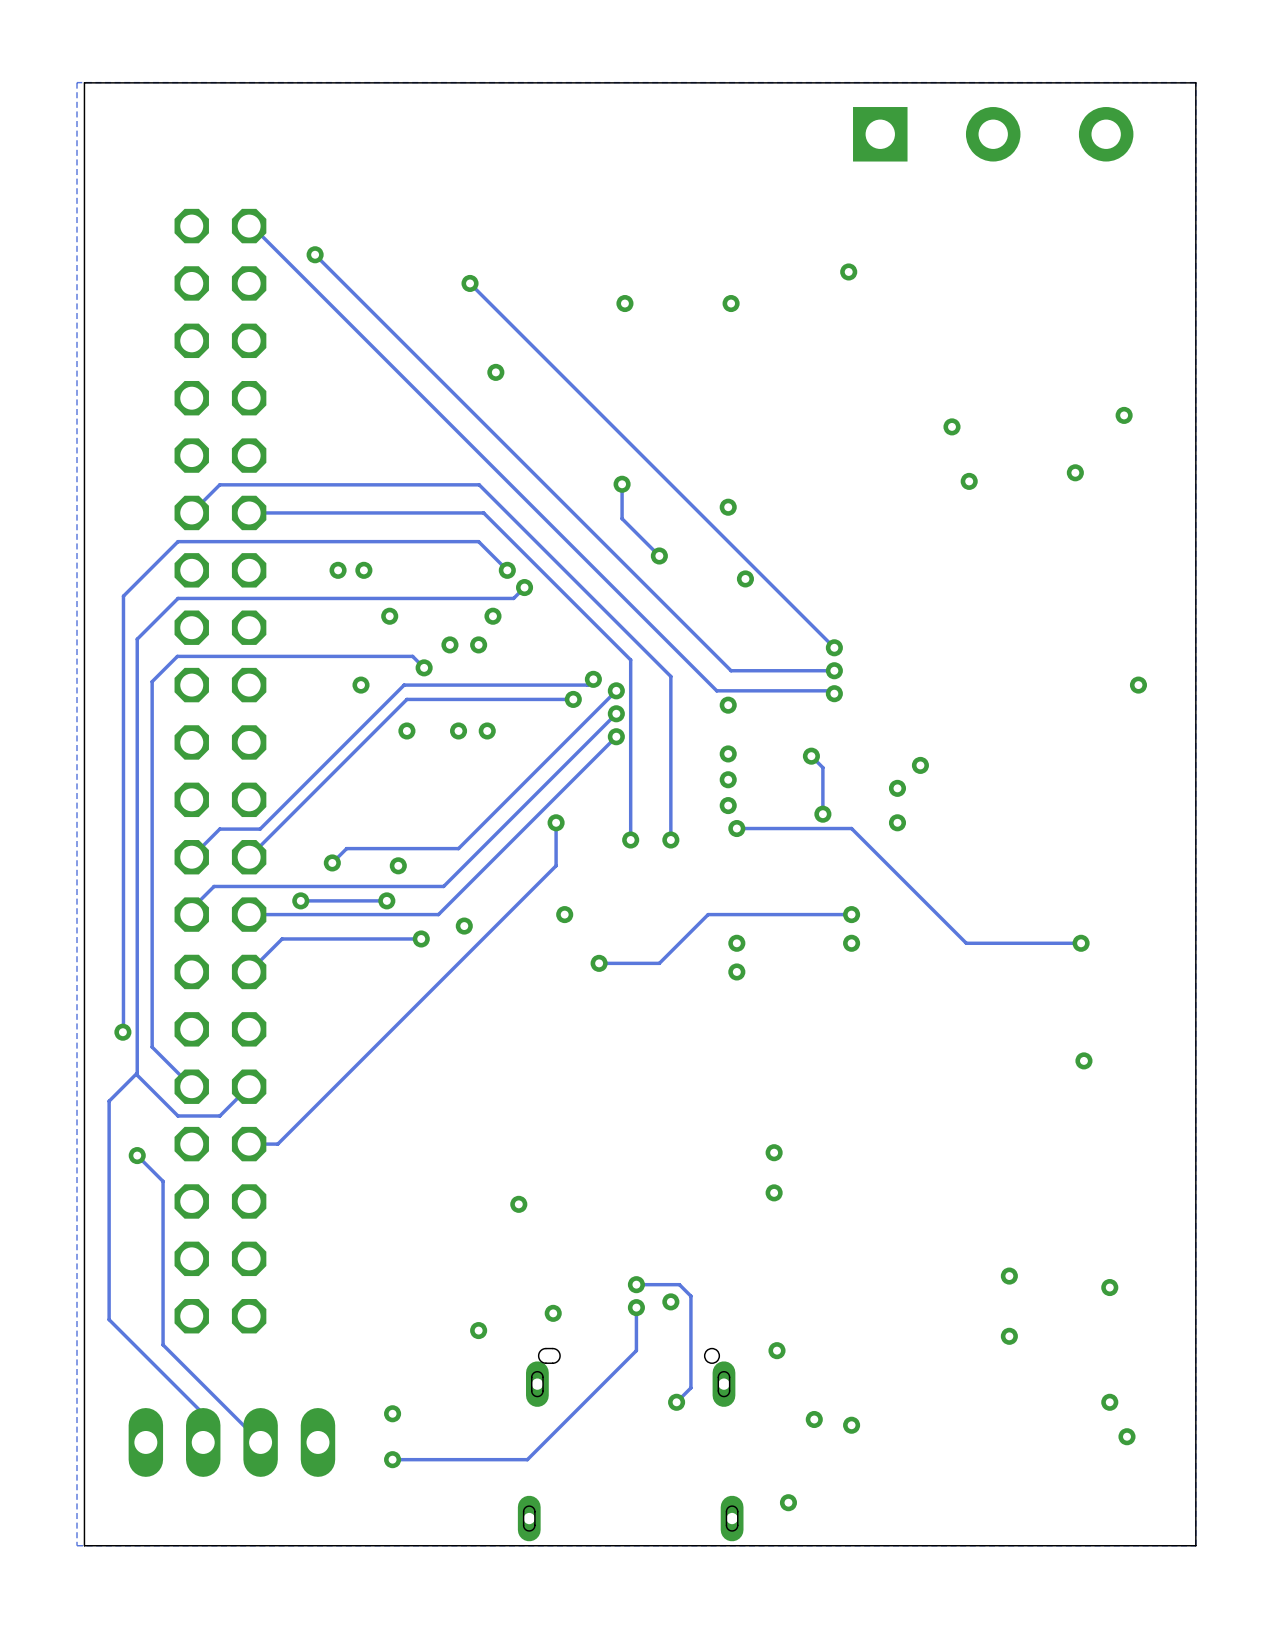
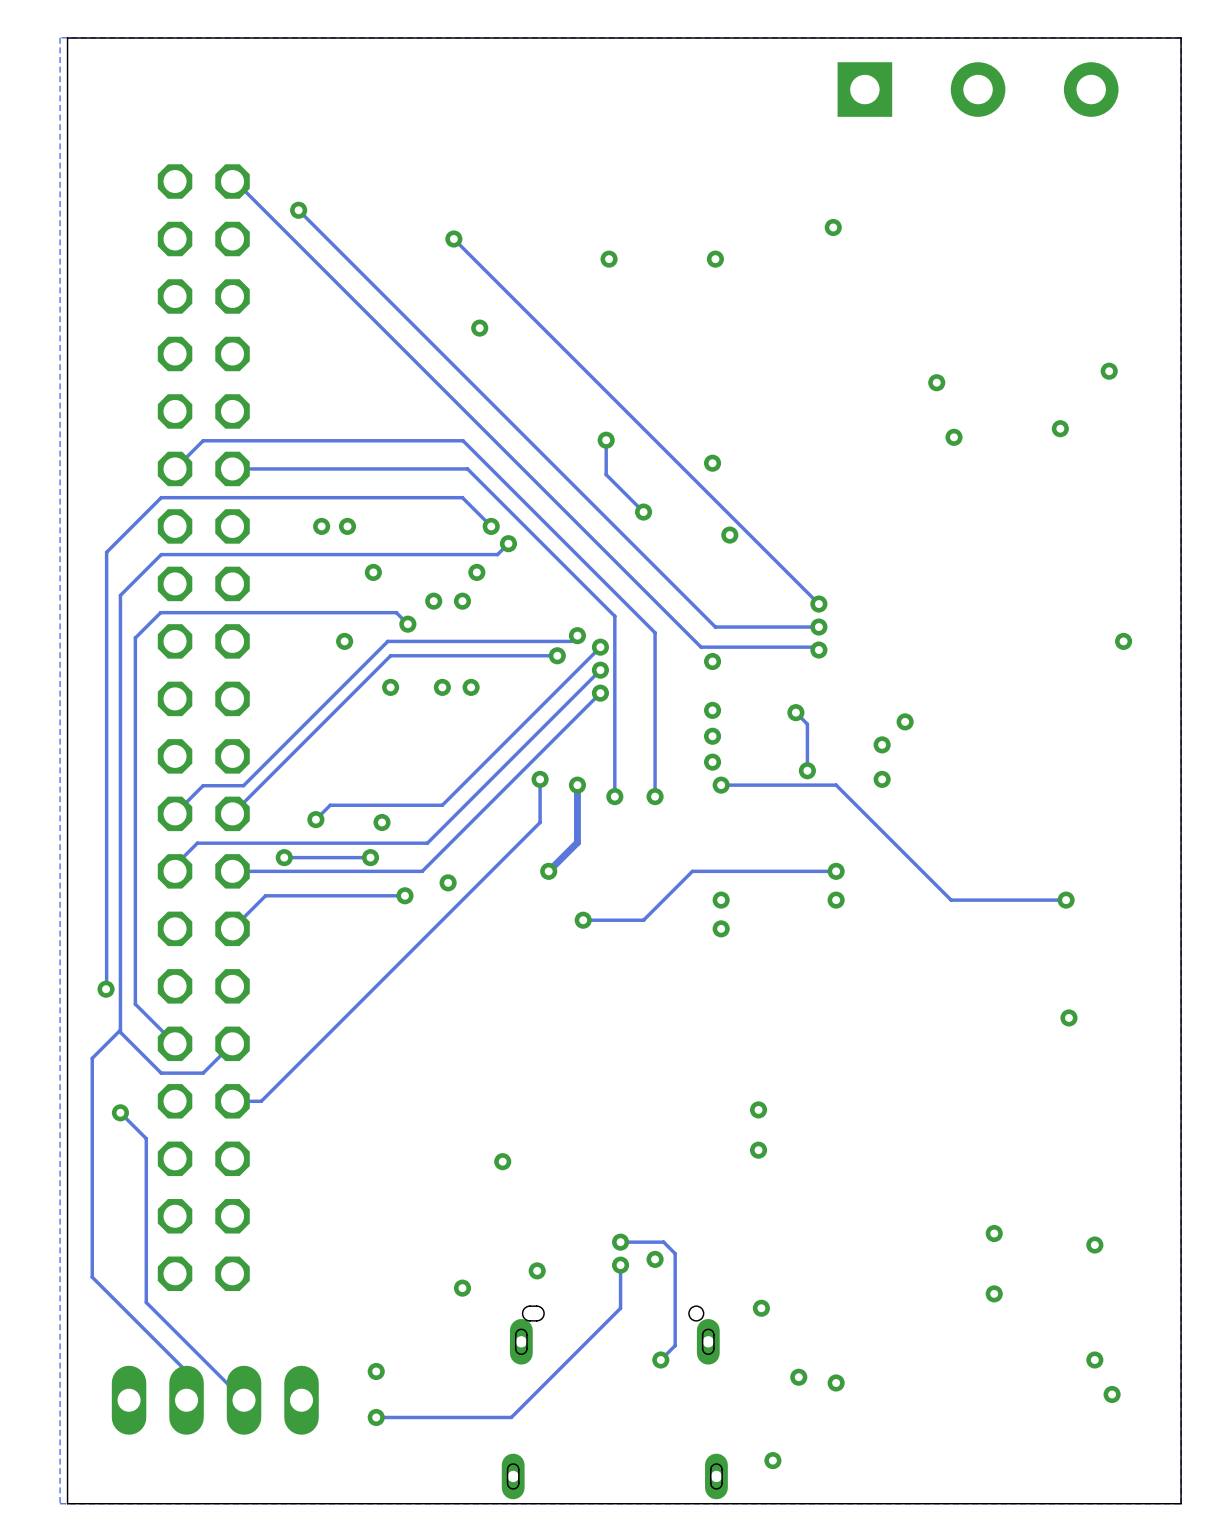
track: none -> (577, 785) (577, 842) (548, 871)
via: none -> (577, 785)

